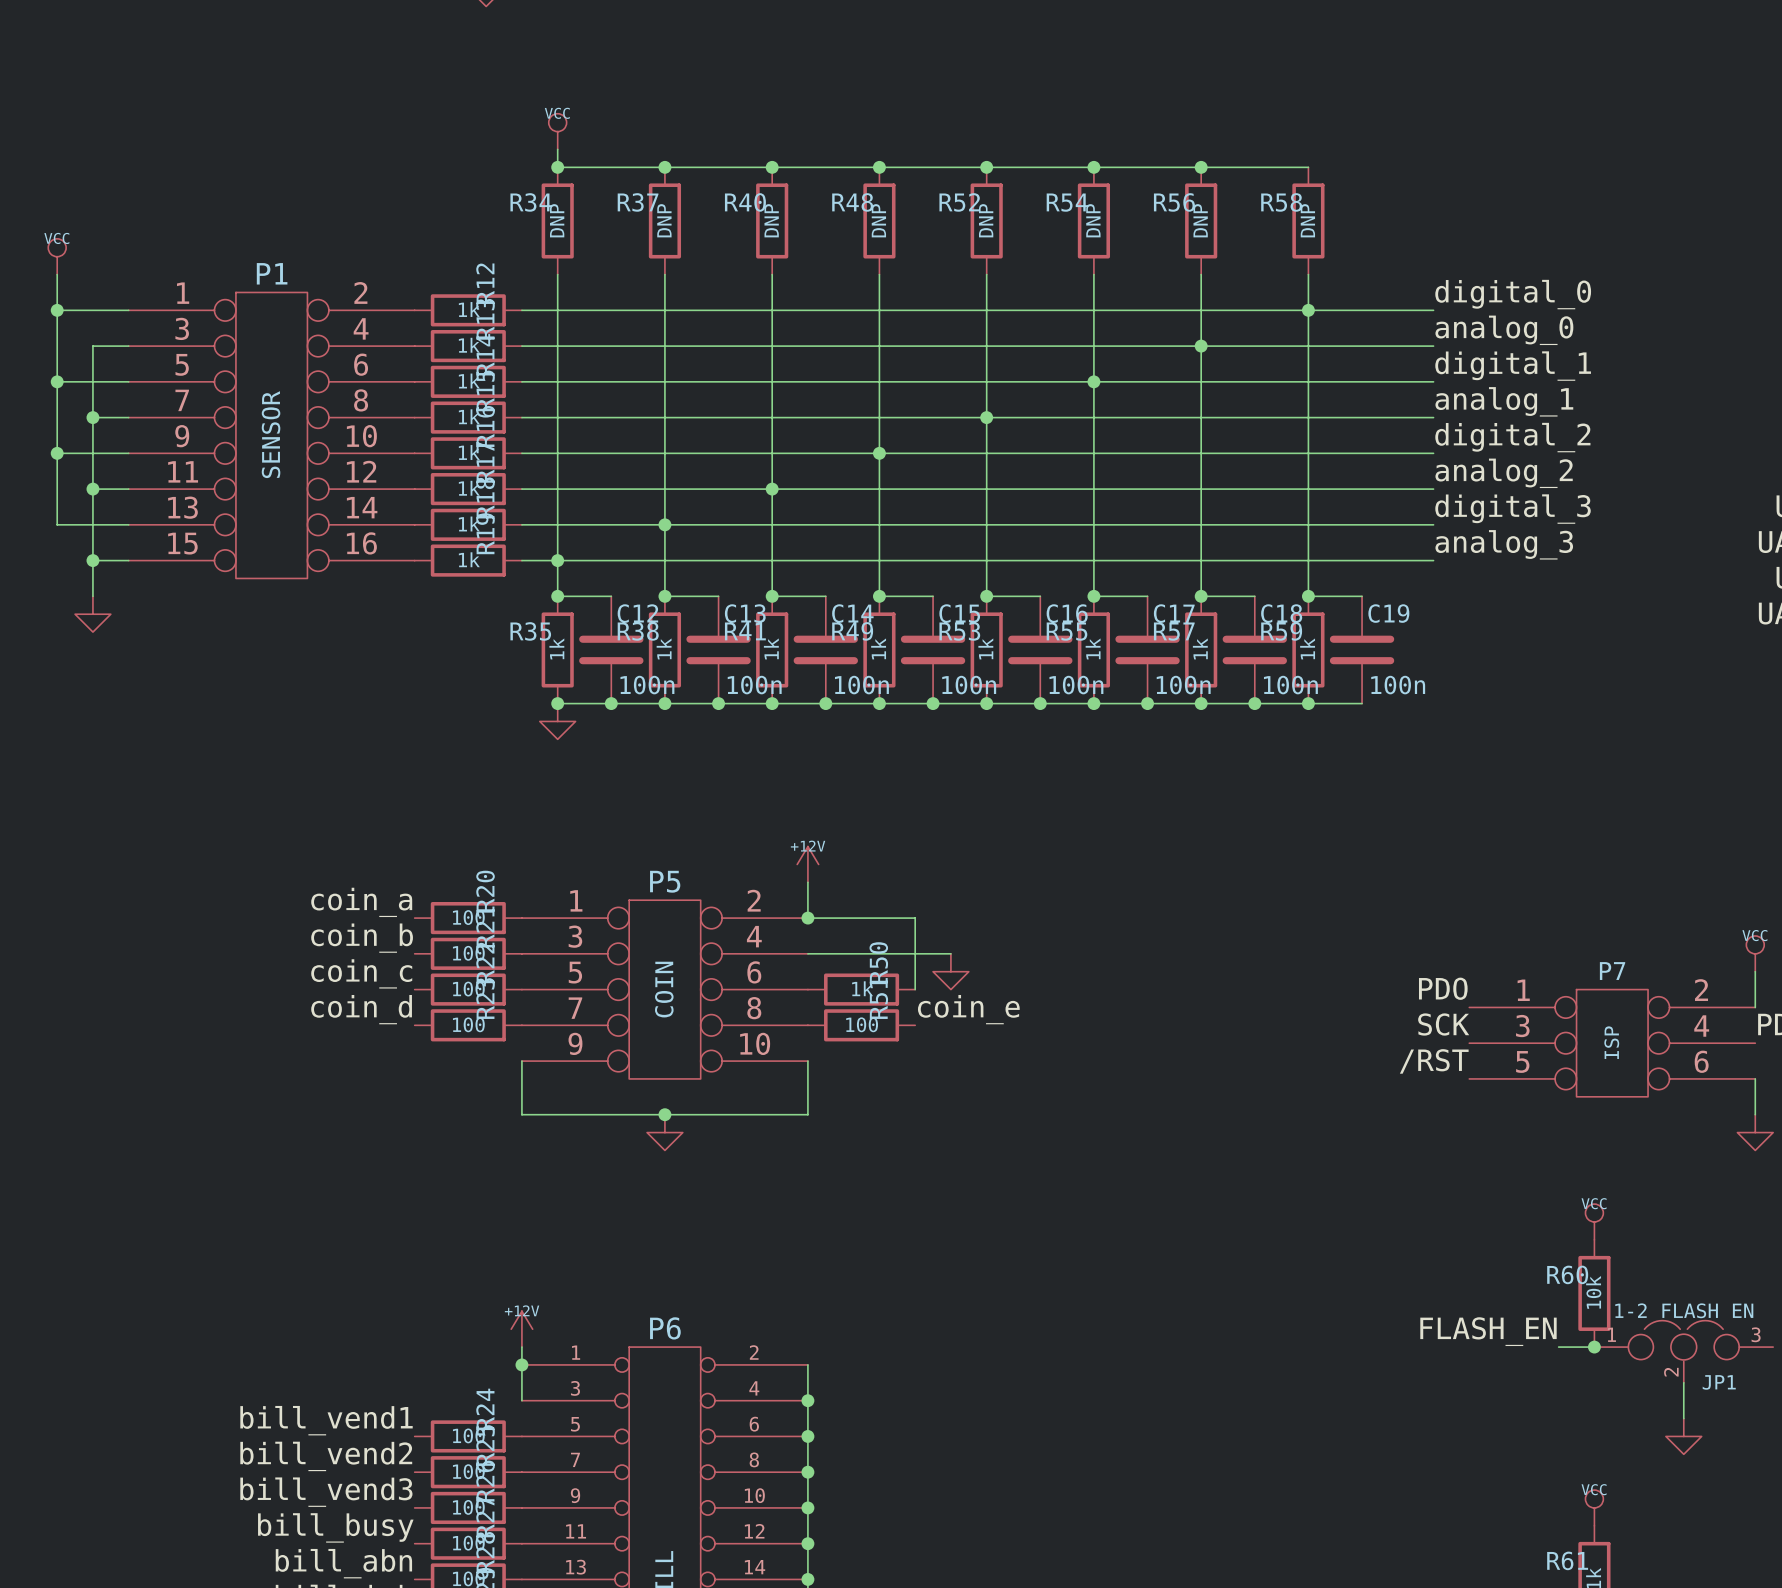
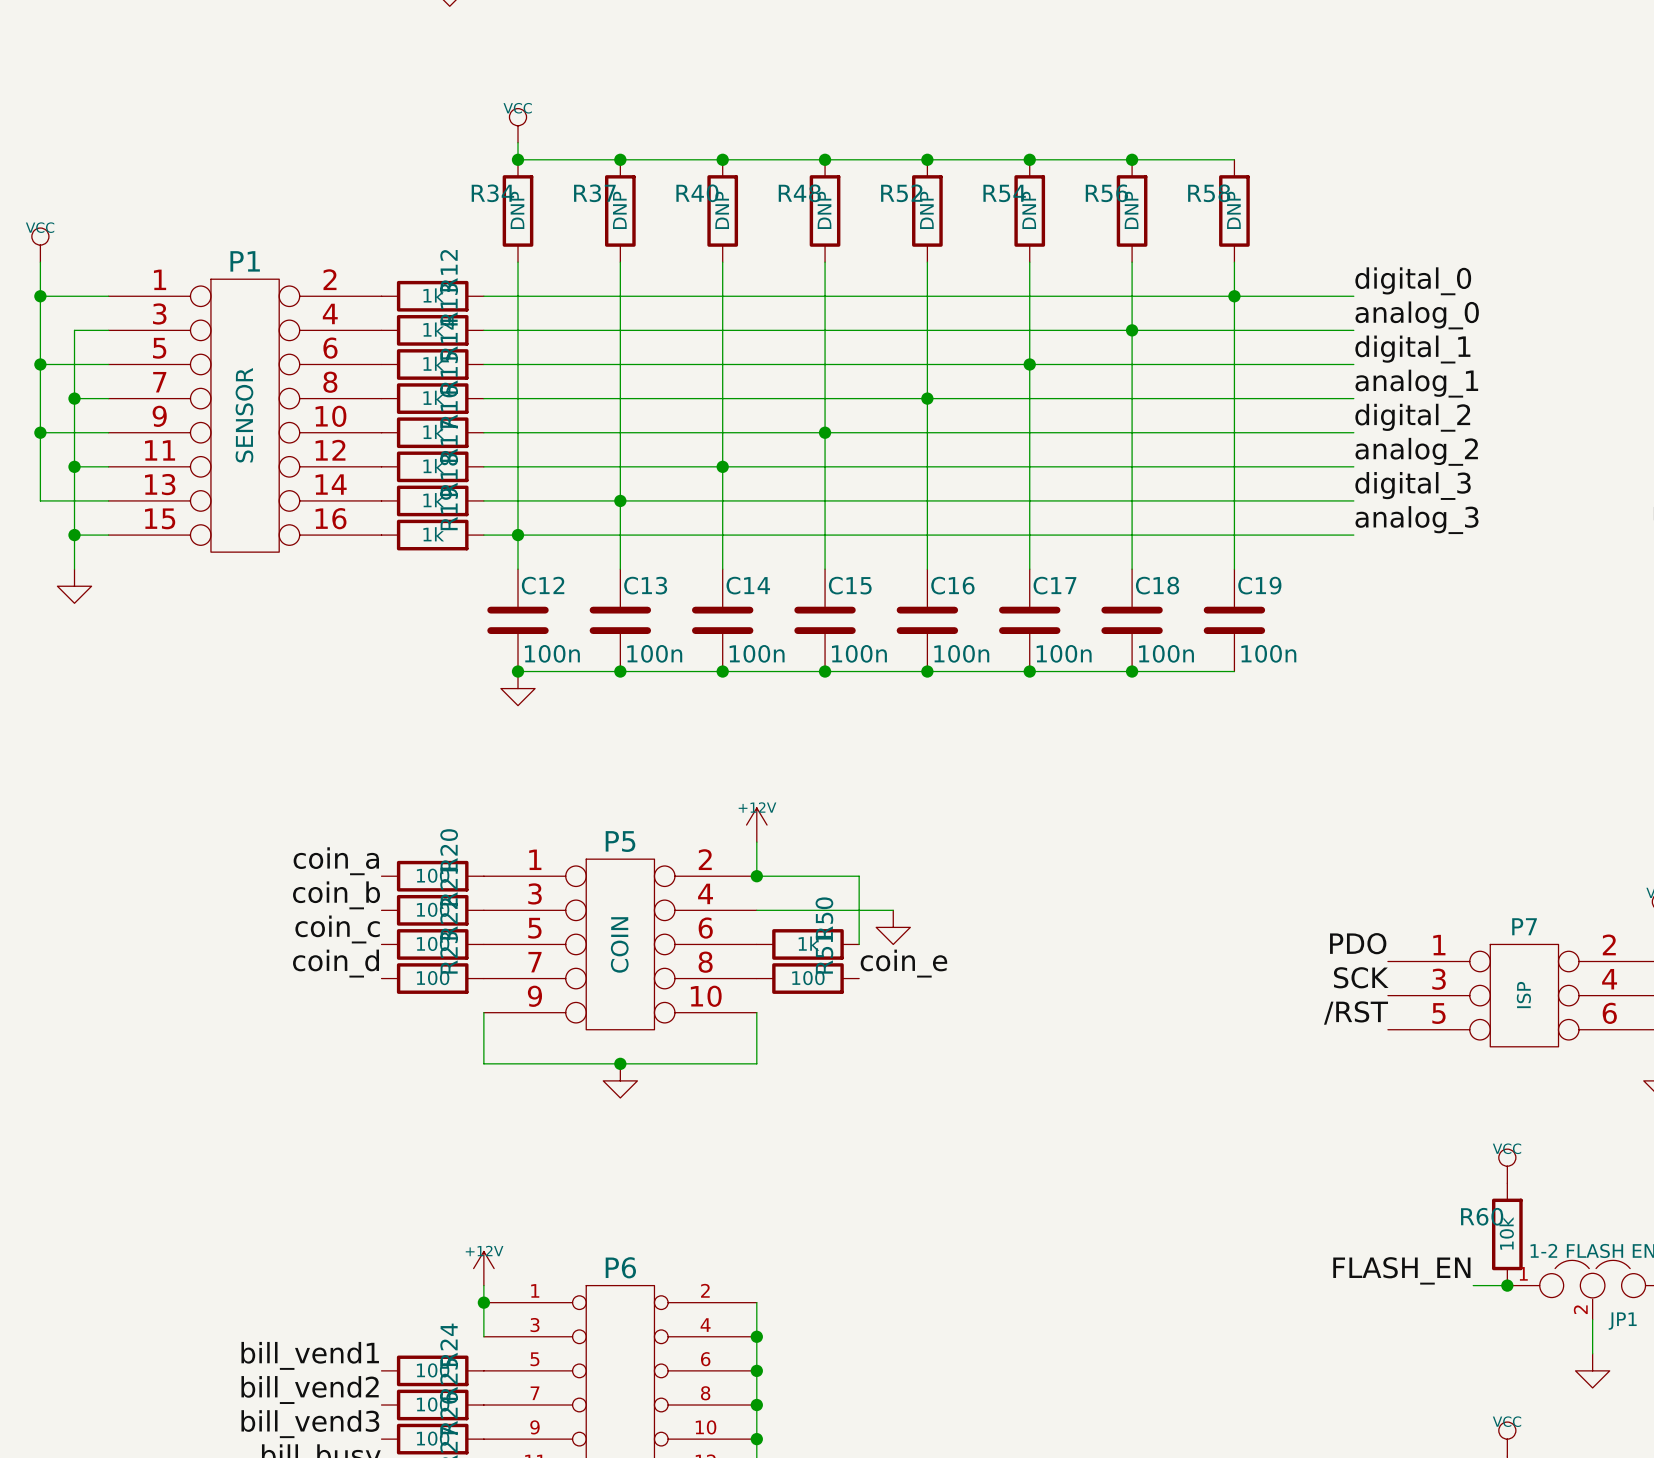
wire: (557, 596) (611, 596) -> none
junction: (557, 596) -> none
wire: (664, 596) (718, 596) -> none
junction: (664, 596) -> none
wire: (772, 596) (825, 596) -> none
junction: (772, 596) -> none
wire: (879, 596) (933, 596) -> none
junction: (879, 596) -> none
wire: (986, 596) (1040, 596) -> none
junction: (986, 596) -> none
wire: (1093, 596) (1147, 596) -> none
junction: (1093, 596) -> none
wire: (1201, 596) (1254, 596) -> none
junction: (1201, 596) -> none
wire: (1308, 596) (1362, 596) -> none
junction: (1308, 596) -> none
R35: 1k (557, 649) -> none
C12 position: (611, 649) -> (518, 620)
R38: 1k (664, 649) -> none
C13 position: (718, 649) -> (620, 620)
R41: 1k (772, 649) -> none
C14 position: (825, 649) -> (722, 620)
R49: 1k (879, 649) -> none
C15 position: (933, 649) -> (825, 620)
R53: 1k (986, 649) -> none
C16 position: (1040, 649) -> (927, 620)
R55: 1k (1093, 649) -> none
C17 position: (1147, 649) -> (1029, 620)
R57: 1k (1201, 649) -> none
C18 position: (1254, 649) -> (1132, 620)
R59: 1k (1308, 649) -> none
C19 position: (1362, 649) -> (1234, 620)
junction: (611, 703) -> none
junction: (718, 703) -> none
junction: (825, 703) -> none
junction: (933, 703) -> none
junction: (1040, 703) -> none
junction: (1147, 703) -> none
junction: (1254, 703) -> none
wire: (1308, 703) (1362, 703) -> none
junction: (1308, 703) -> none

